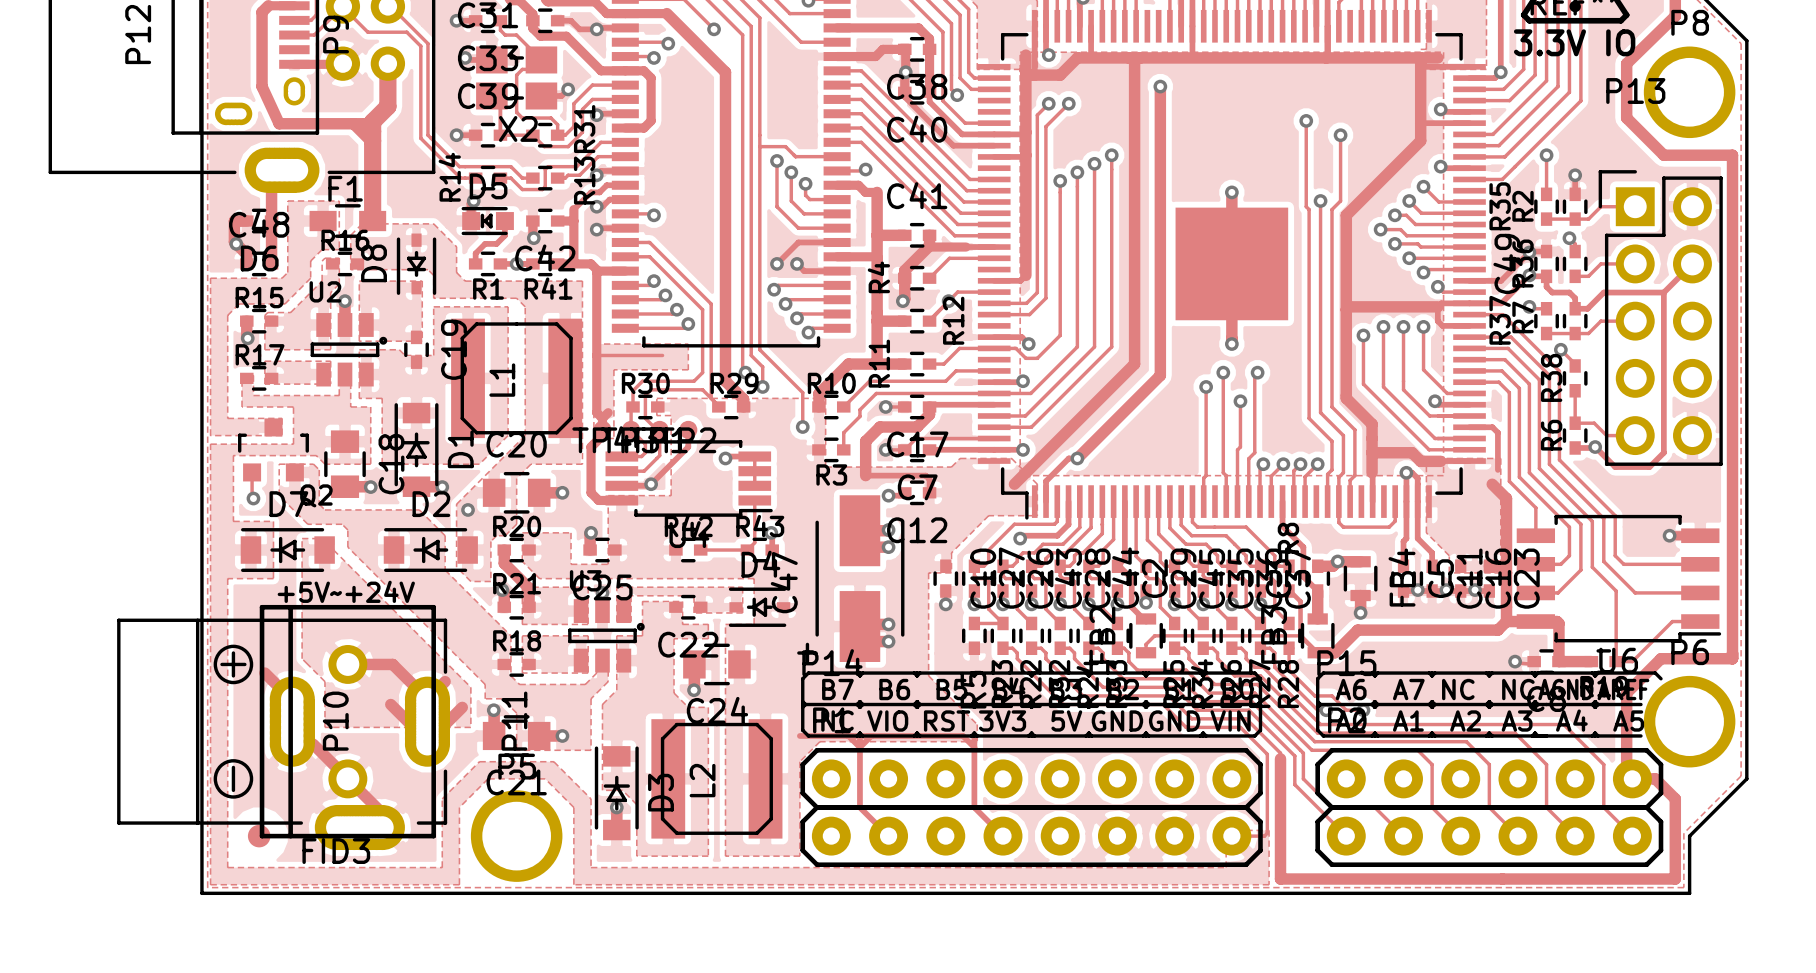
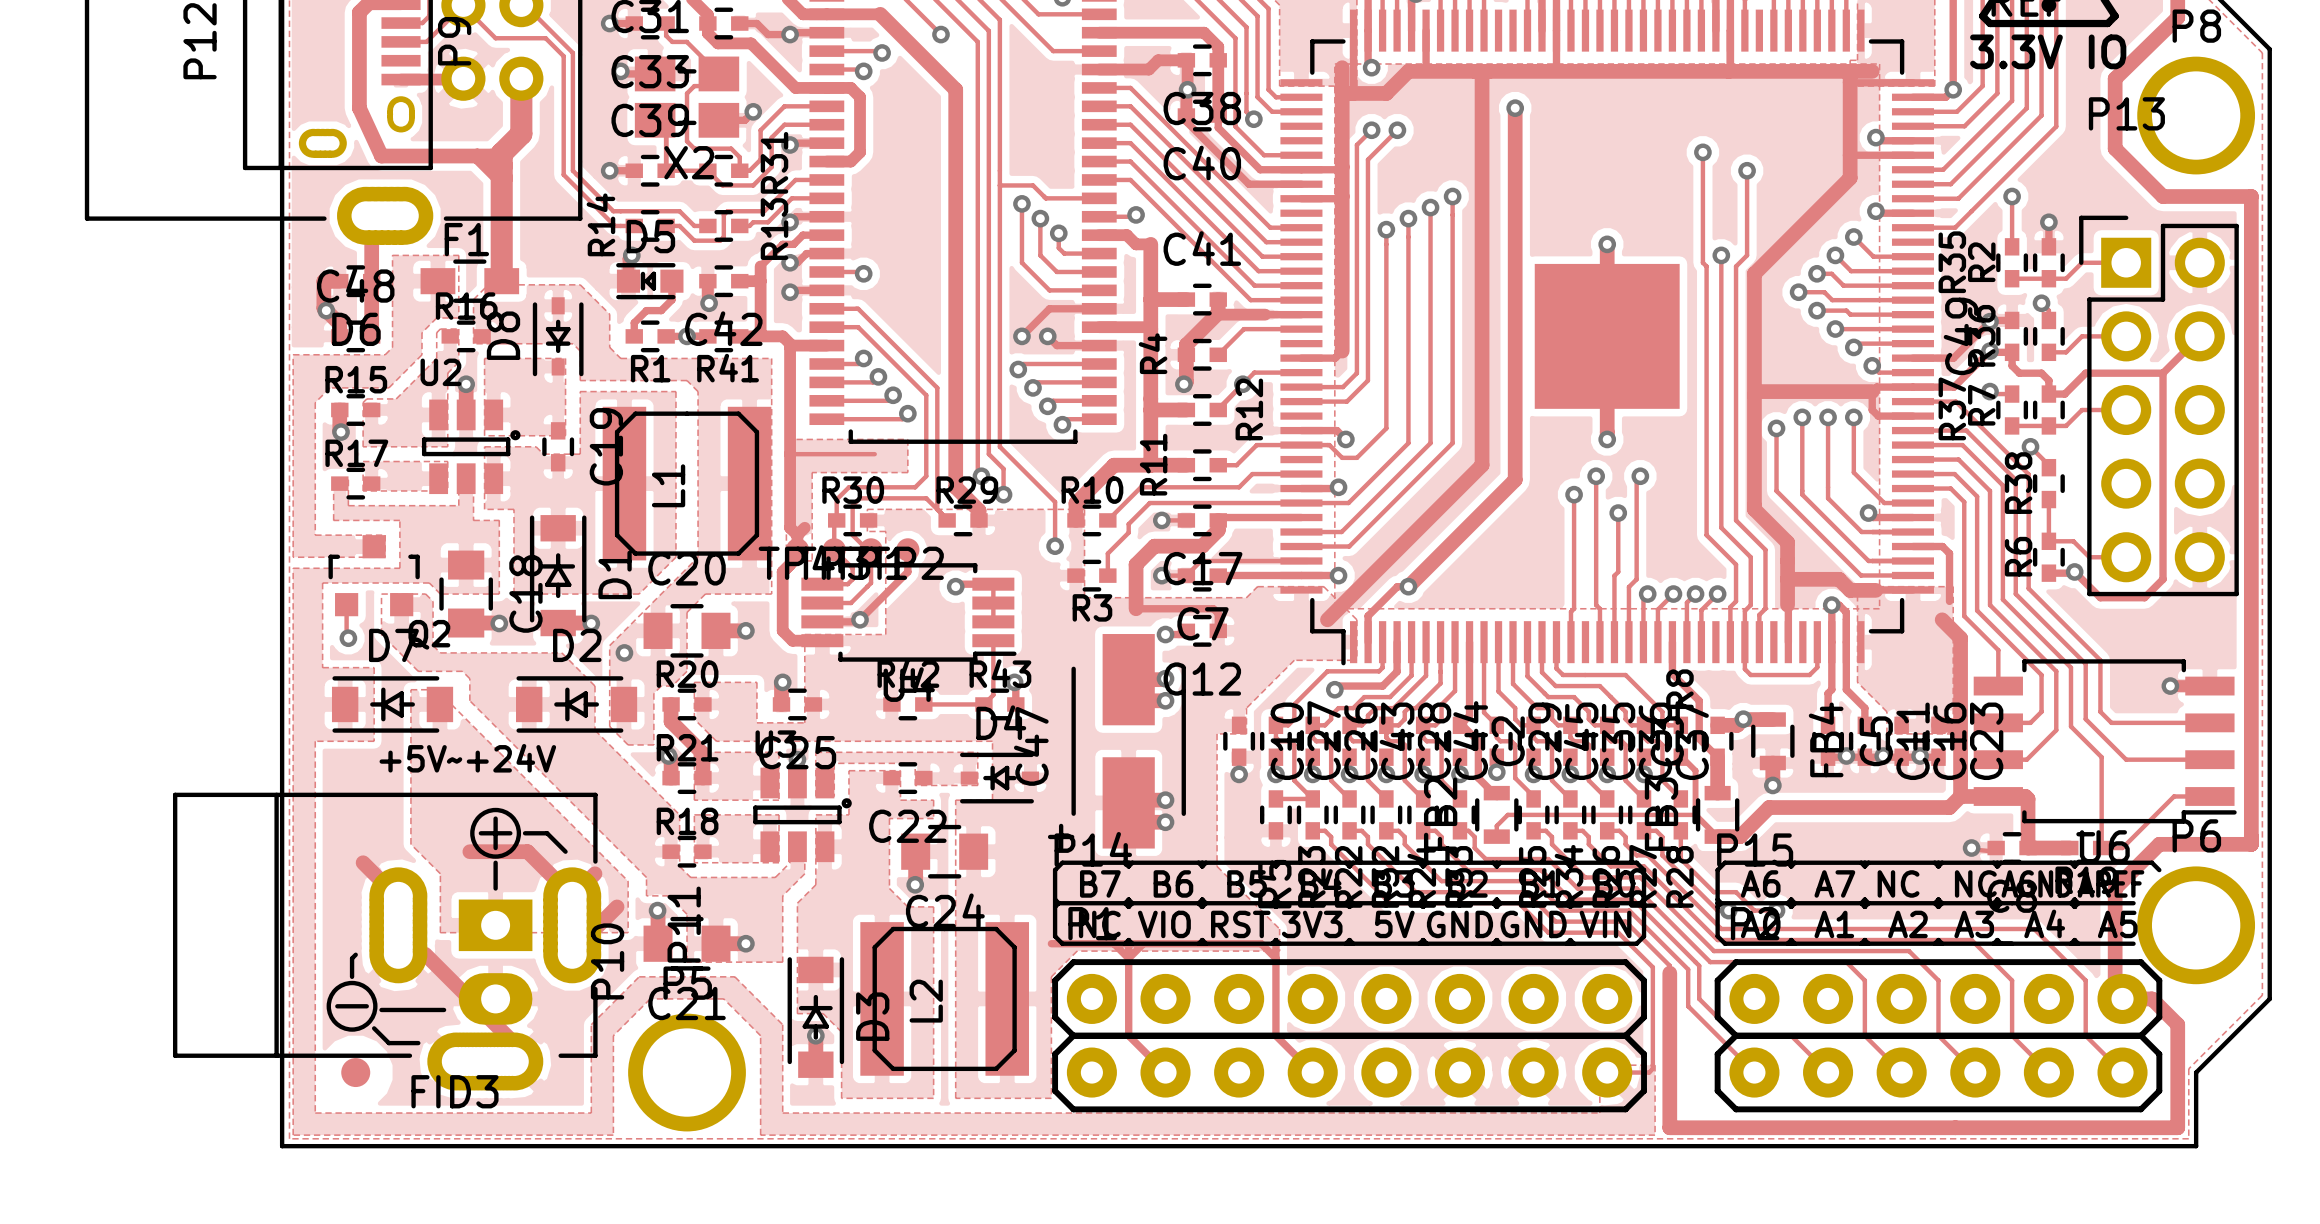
P10 footprint: [259, 604, 436, 839] -> [458, 899, 533, 1025]
drawing: none -> [470, 807, 522, 859]
drawing: [213, 644, 254, 685] -> none
line: none -> (525, 833) (547, 833) (565, 851)
line: (233, 653) (233, 675) -> (495, 818) (495, 848)
line: (221, 664) (244, 664) -> (480, 833) (510, 833)
line: none -> (495, 862) (495, 888)
track: (390, 704) (427, 741) -> none
P10 name position: P10 (335, 721) -> P10 (607, 961)
line: none -> (355, 954) (352, 958) (352, 976)
line: (233, 767) (233, 790) -> none
drawing position: (233, 778) -> (352, 1006)
line: none -> (337, 1006) (366, 1006)
line: none -> (381, 1009) (444, 1009)
line: none -> (374, 1028) (388, 1043) (418, 1043)

